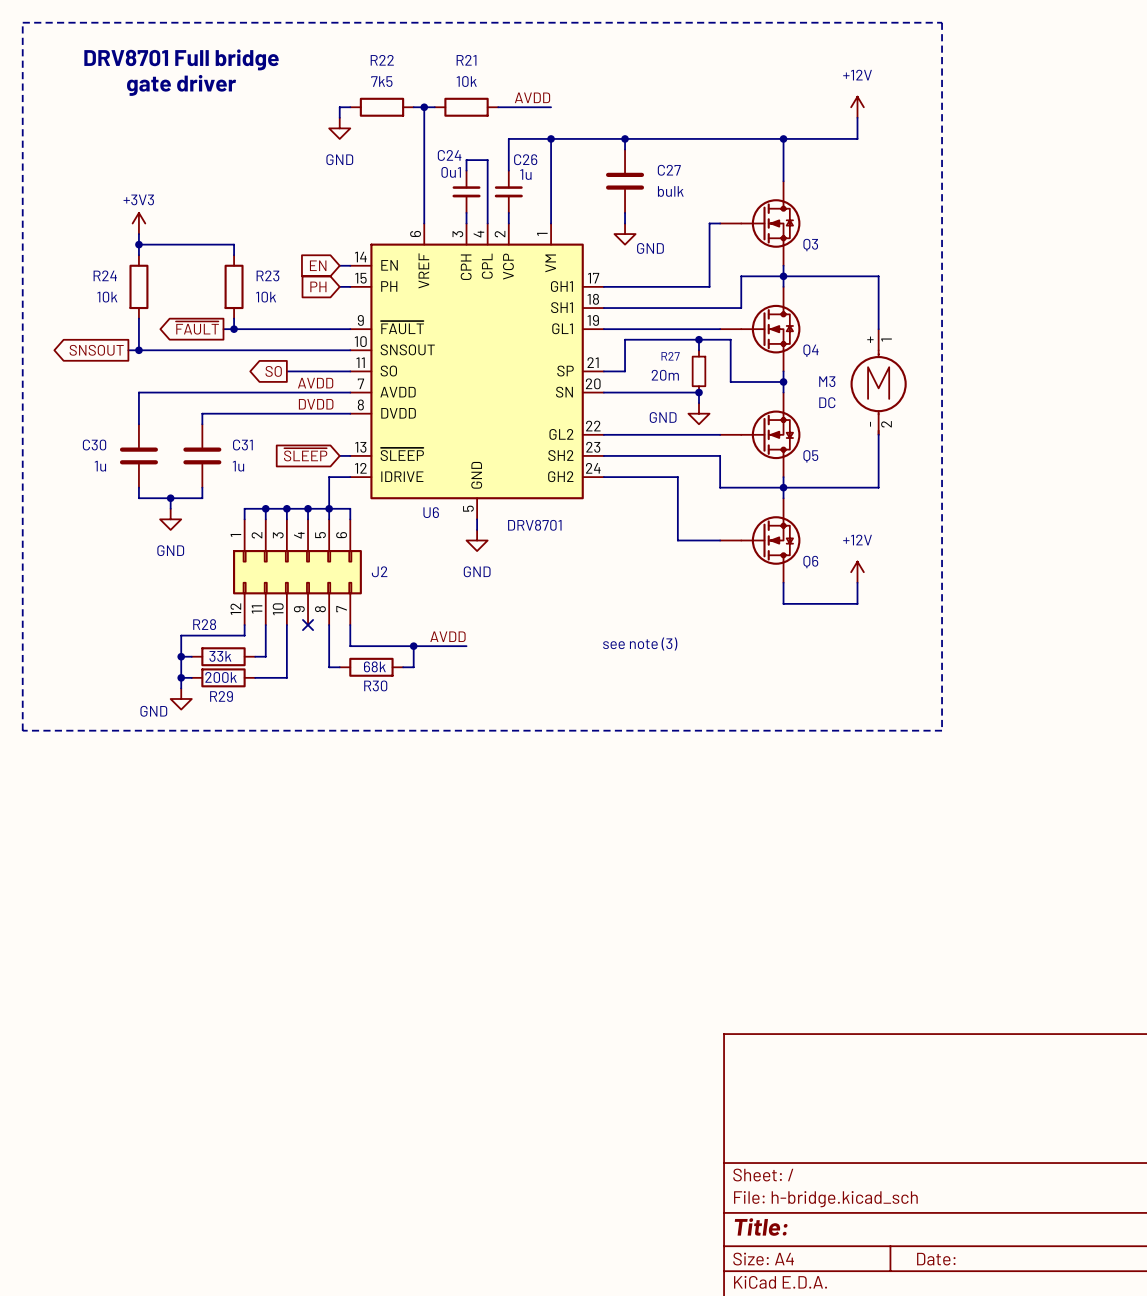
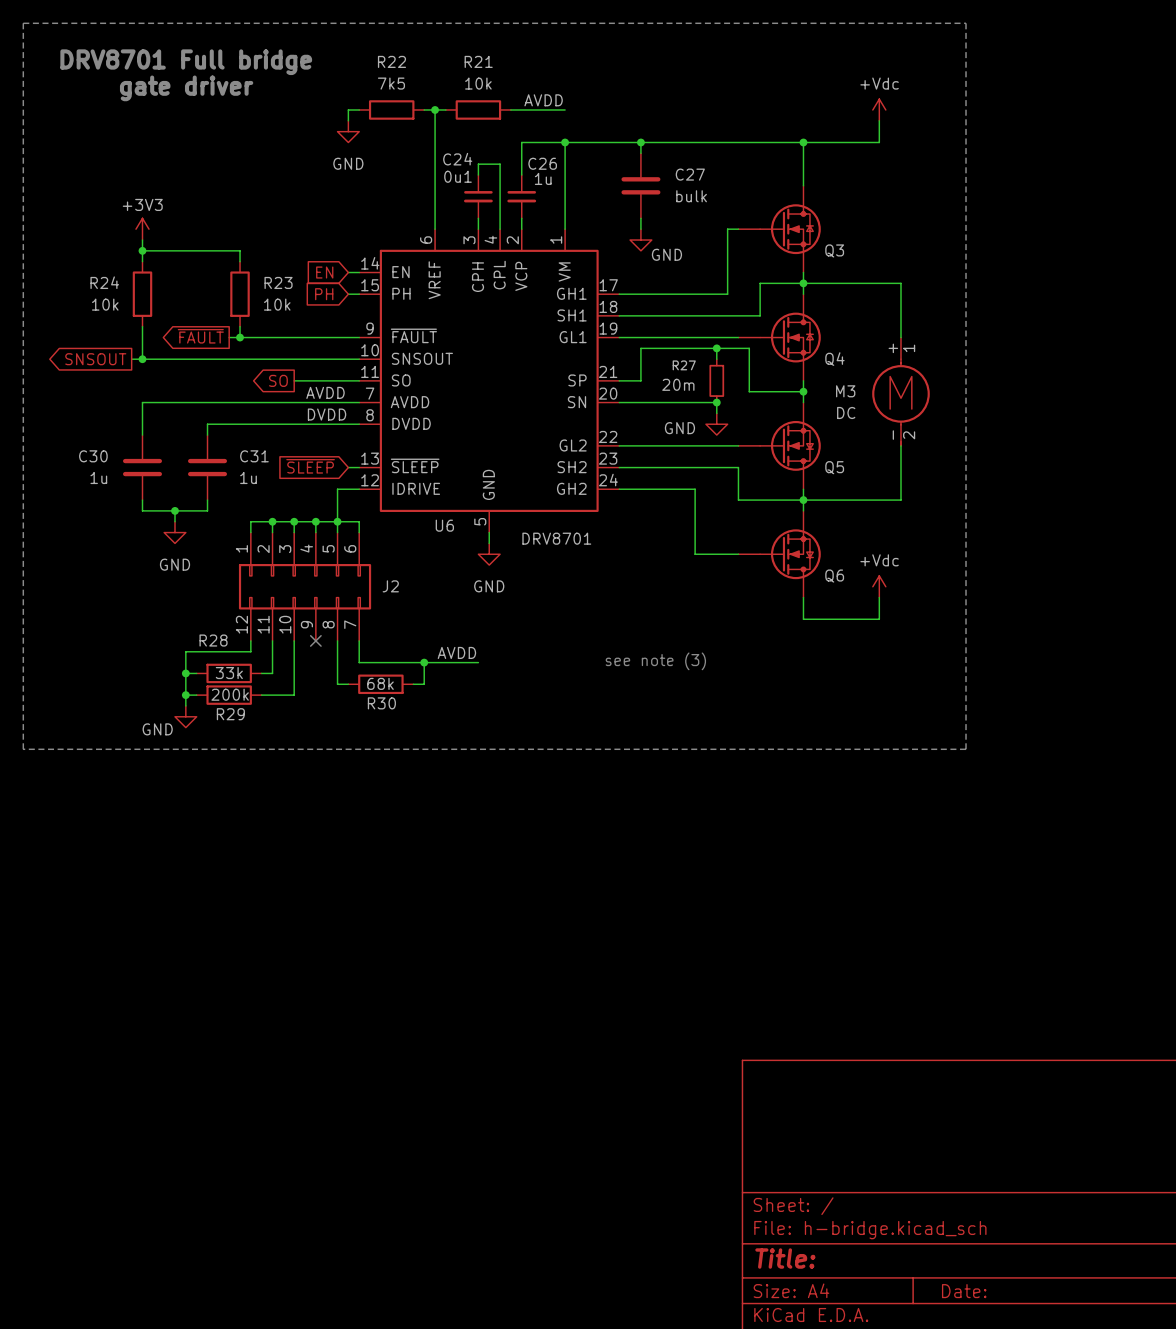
power symbol: +12V (857, 107) -> +Vdc (879, 109)
power symbol: +12V (857, 572) -> +Vdc (879, 586)

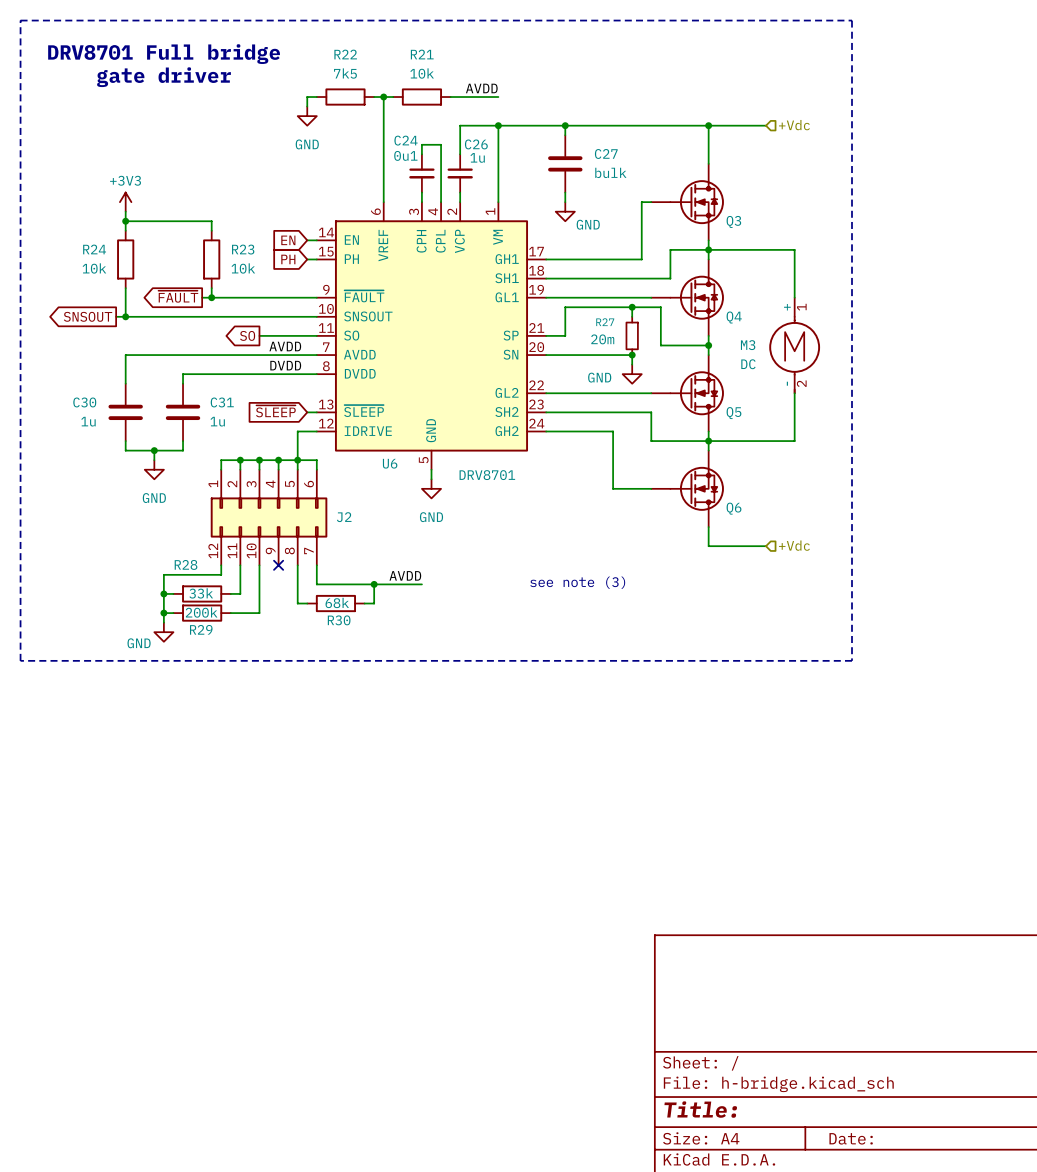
power symbol: +Vdc (879, 109) -> none
wire: (879, 120) (879, 142) (868, 142) -> none
hierarchical label: none -> +Vdc (794, 125)
power symbol: +Vdc (879, 586) -> none
wire: (879, 597) (879, 619) (868, 619) -> none
hierarchical label: none -> +Vdc (794, 545)

